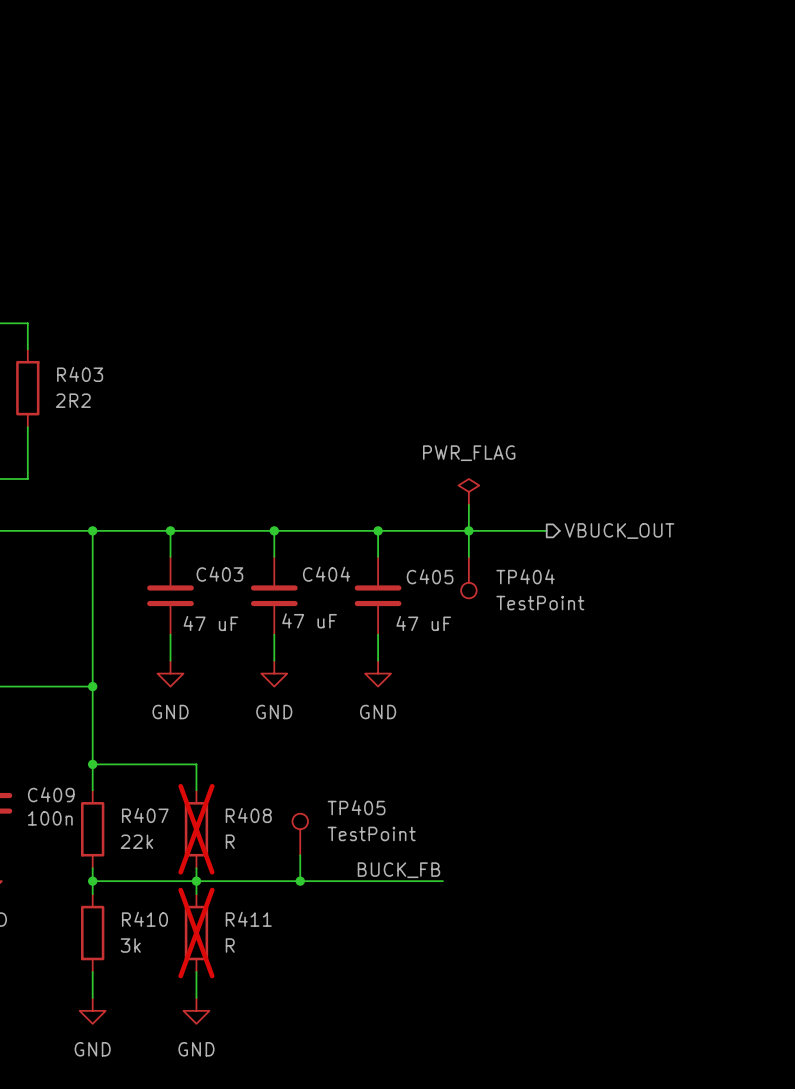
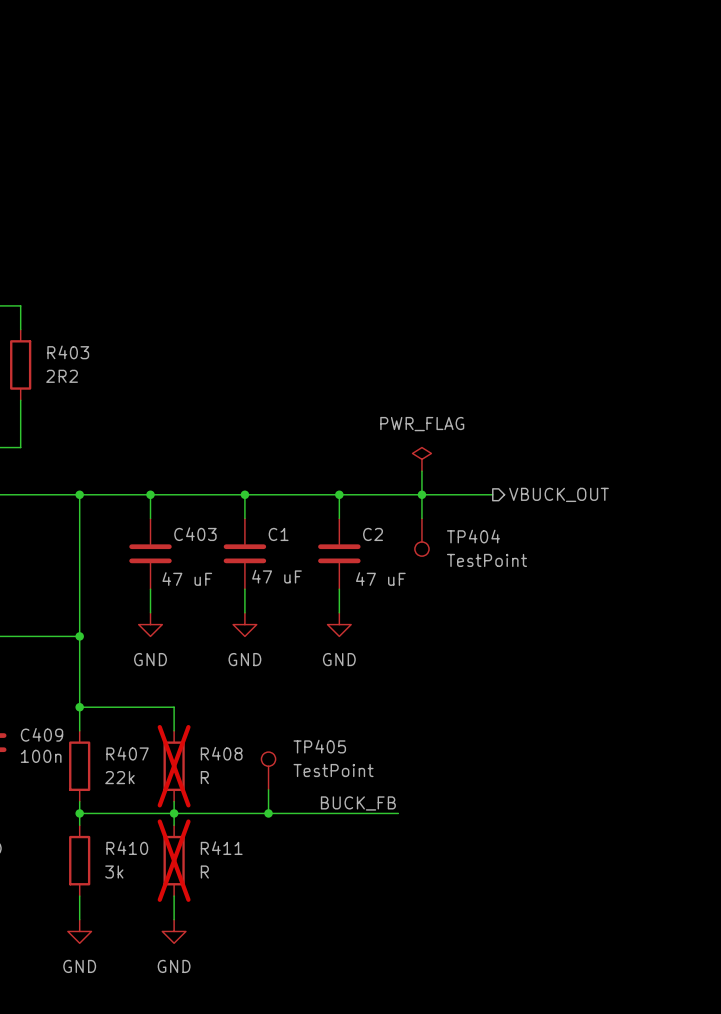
C404 name: C404 (326, 574) -> C1 (278, 534)
C405 name: C405 (430, 576) -> C2 (373, 534)

